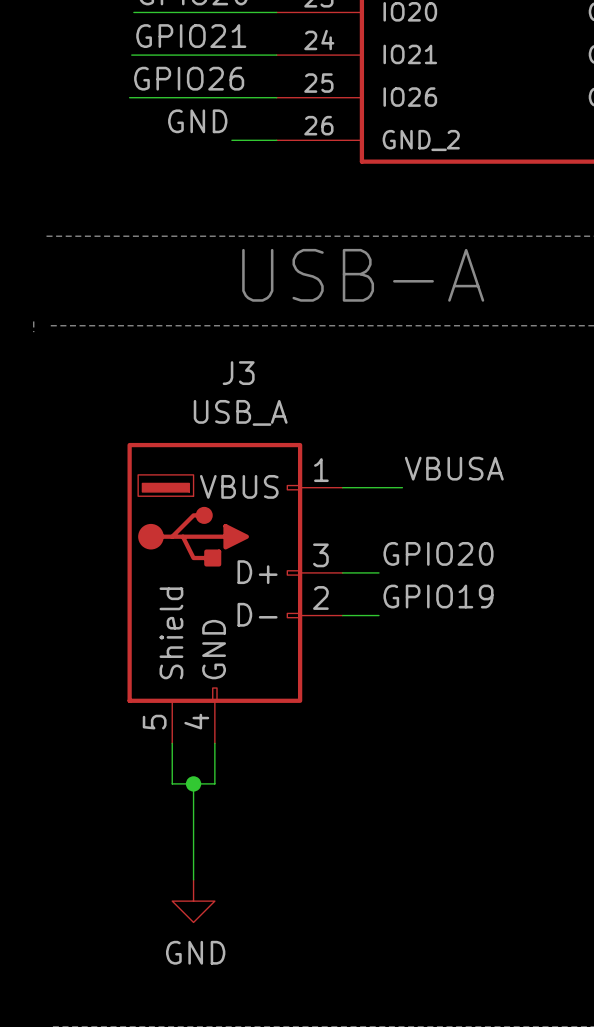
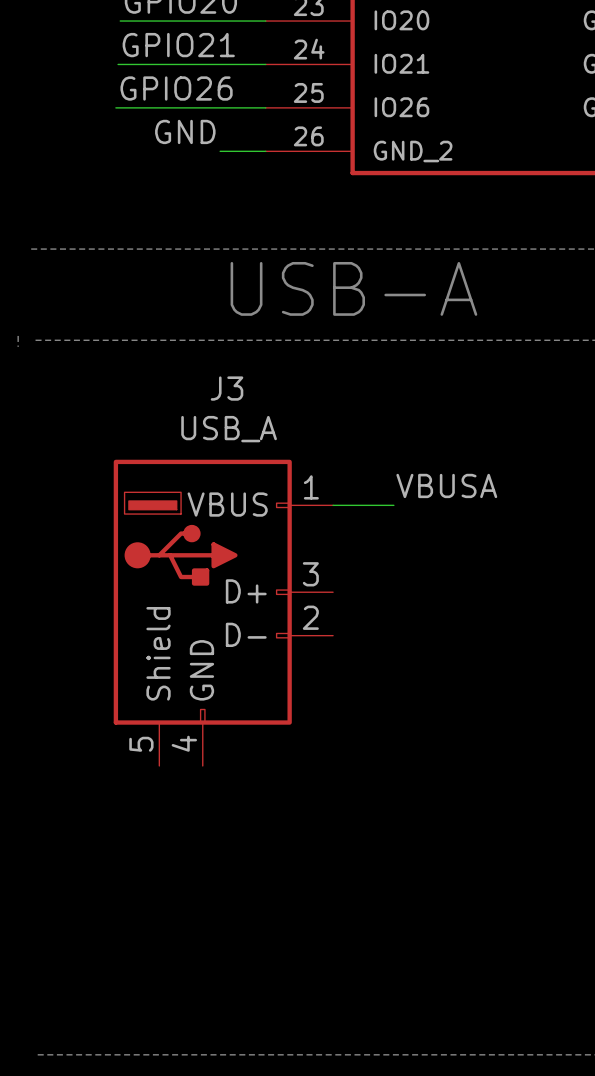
label: GPIO20 (438, 553) -> none
wire: (342, 572) (378, 572) -> none
label: GPIO19 (438, 596) -> none
wire: (342, 615) (378, 615) -> none
wire: (172, 743) (172, 783) (214, 783) (214, 743) -> none
wire: (193, 783) (193, 879) -> none
junction: (193, 783) -> none
power symbol: GND (193, 901) -> none

